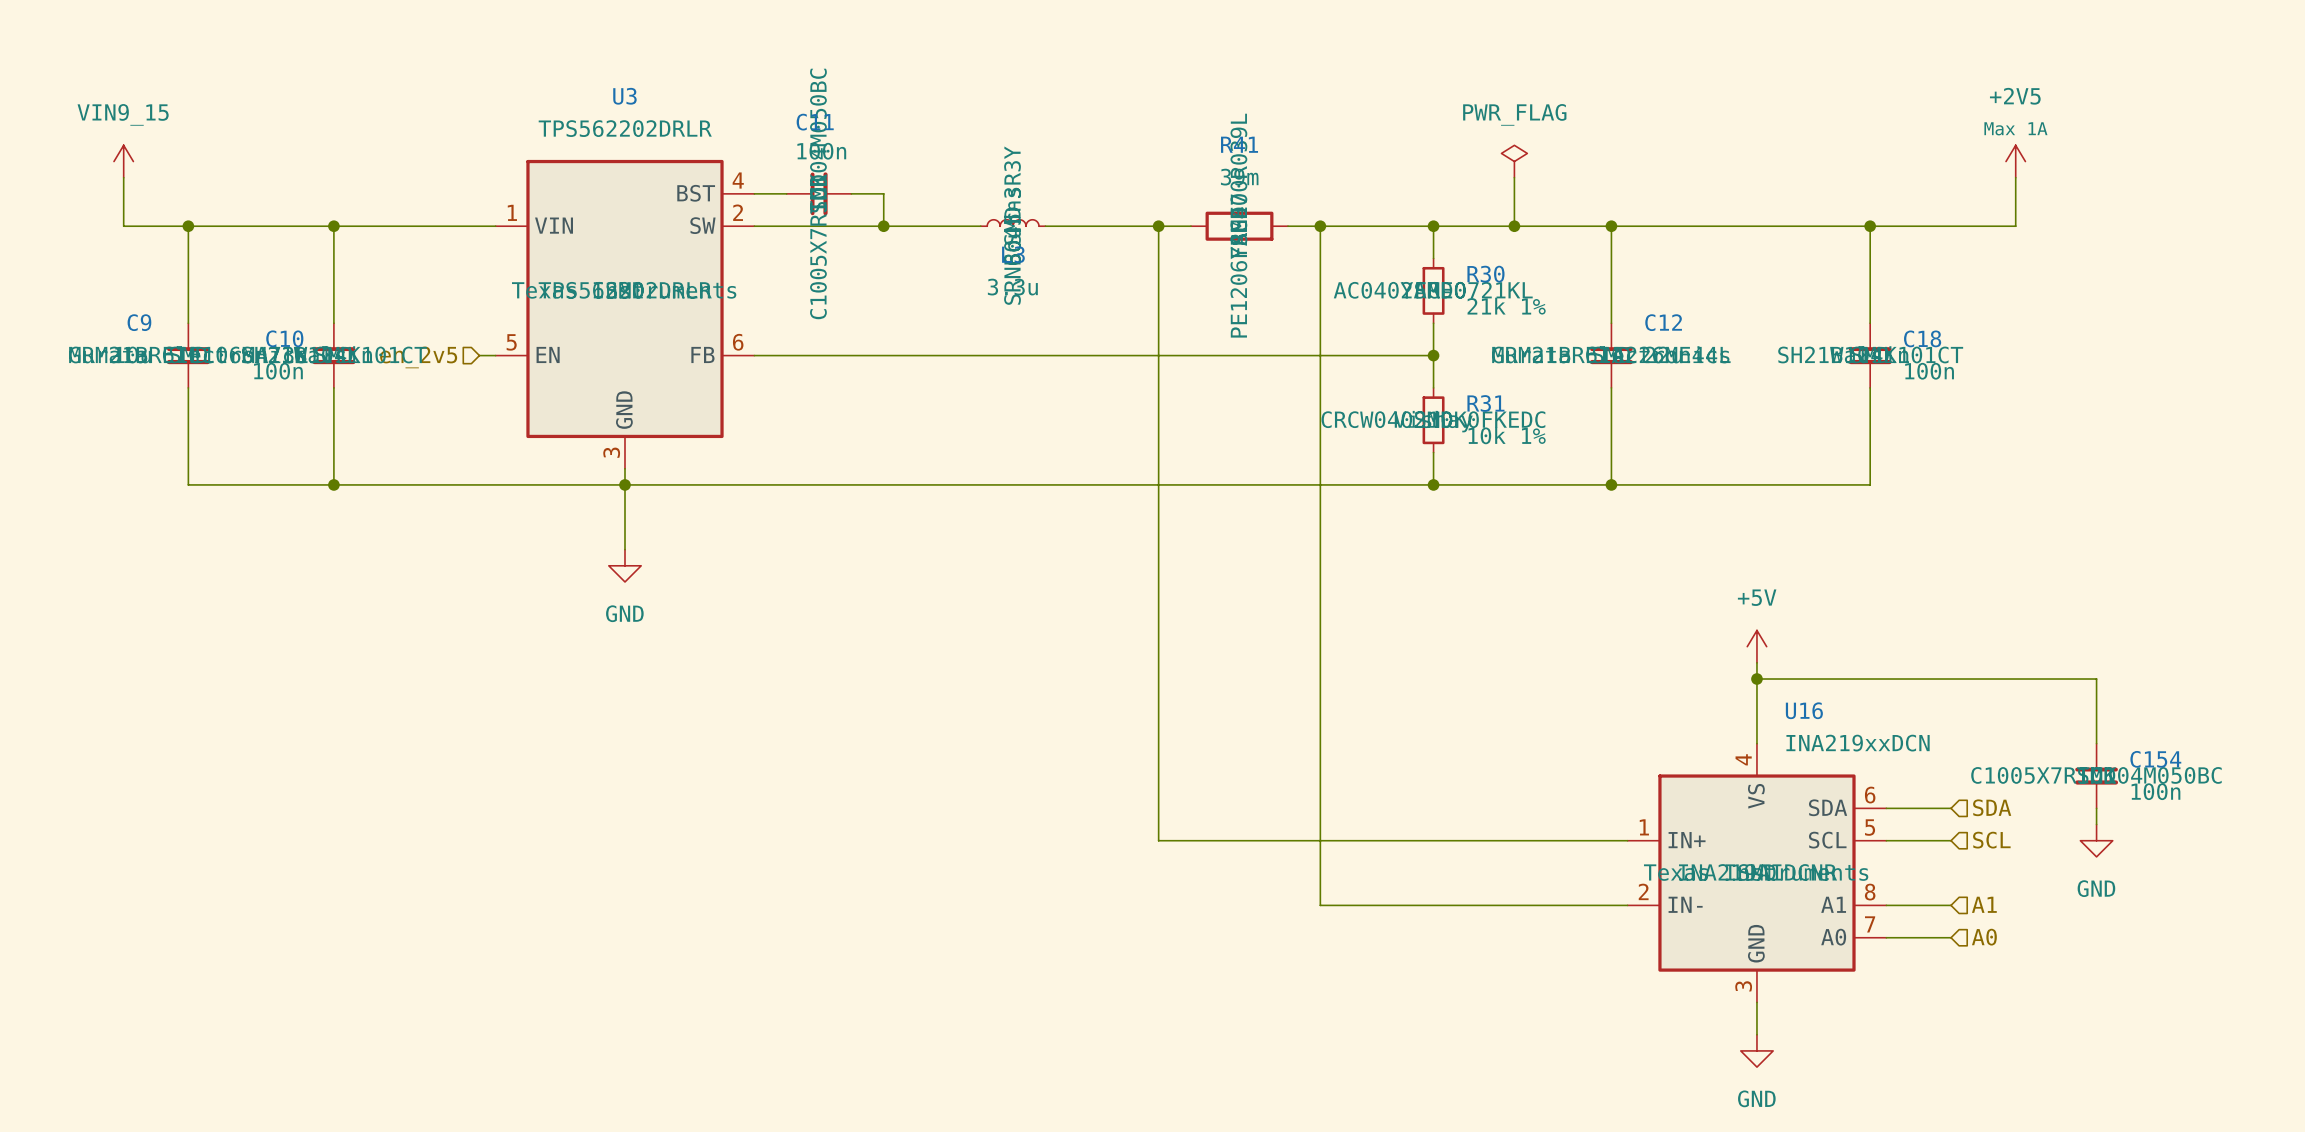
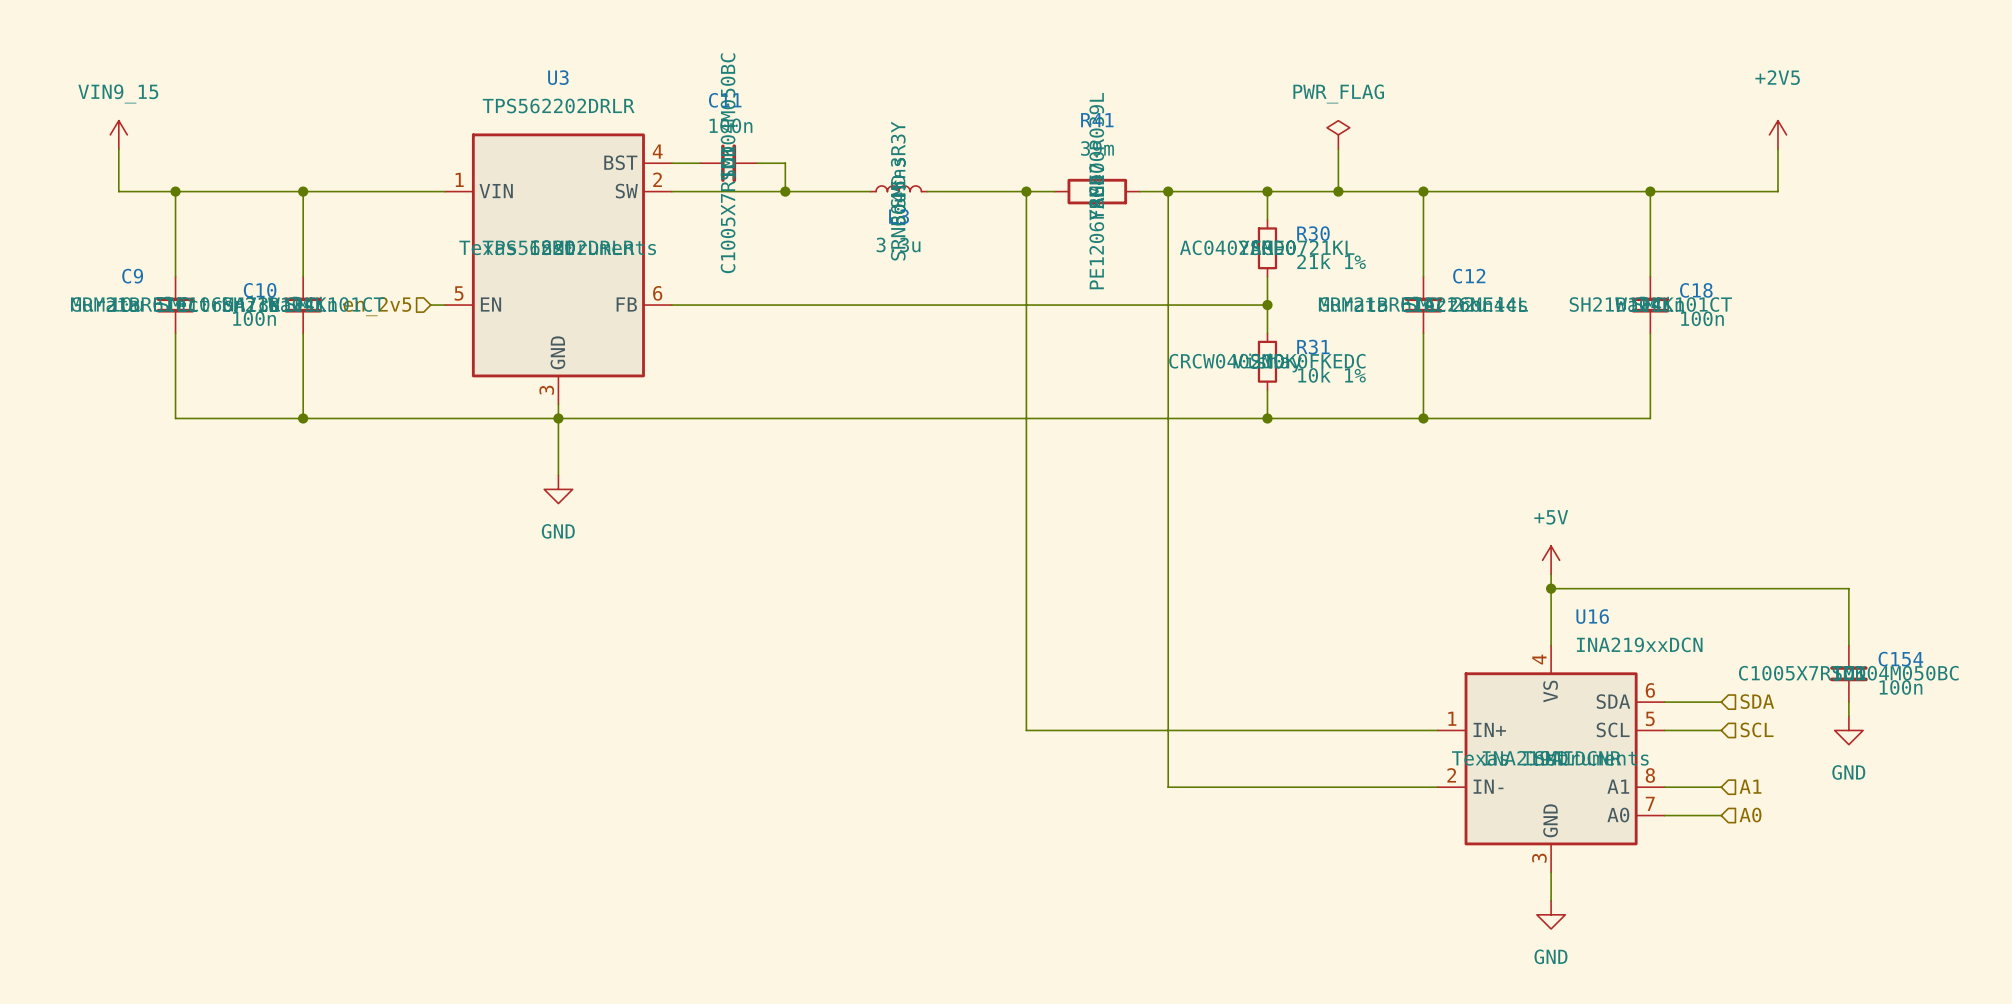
power symbol text: Max 1A (2015, 128) -> none

